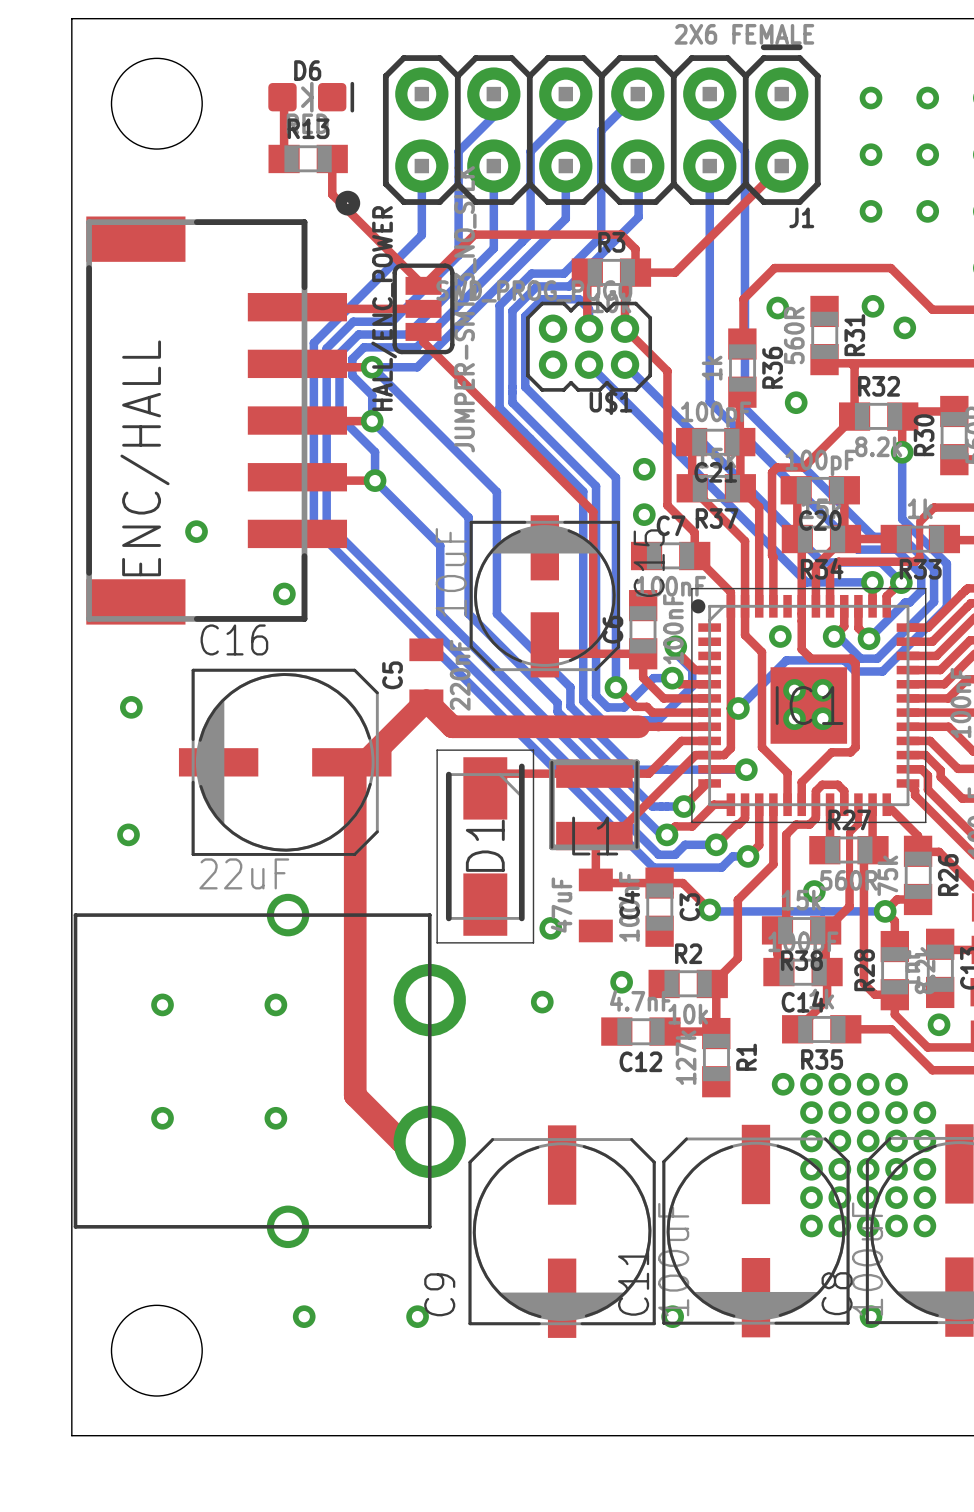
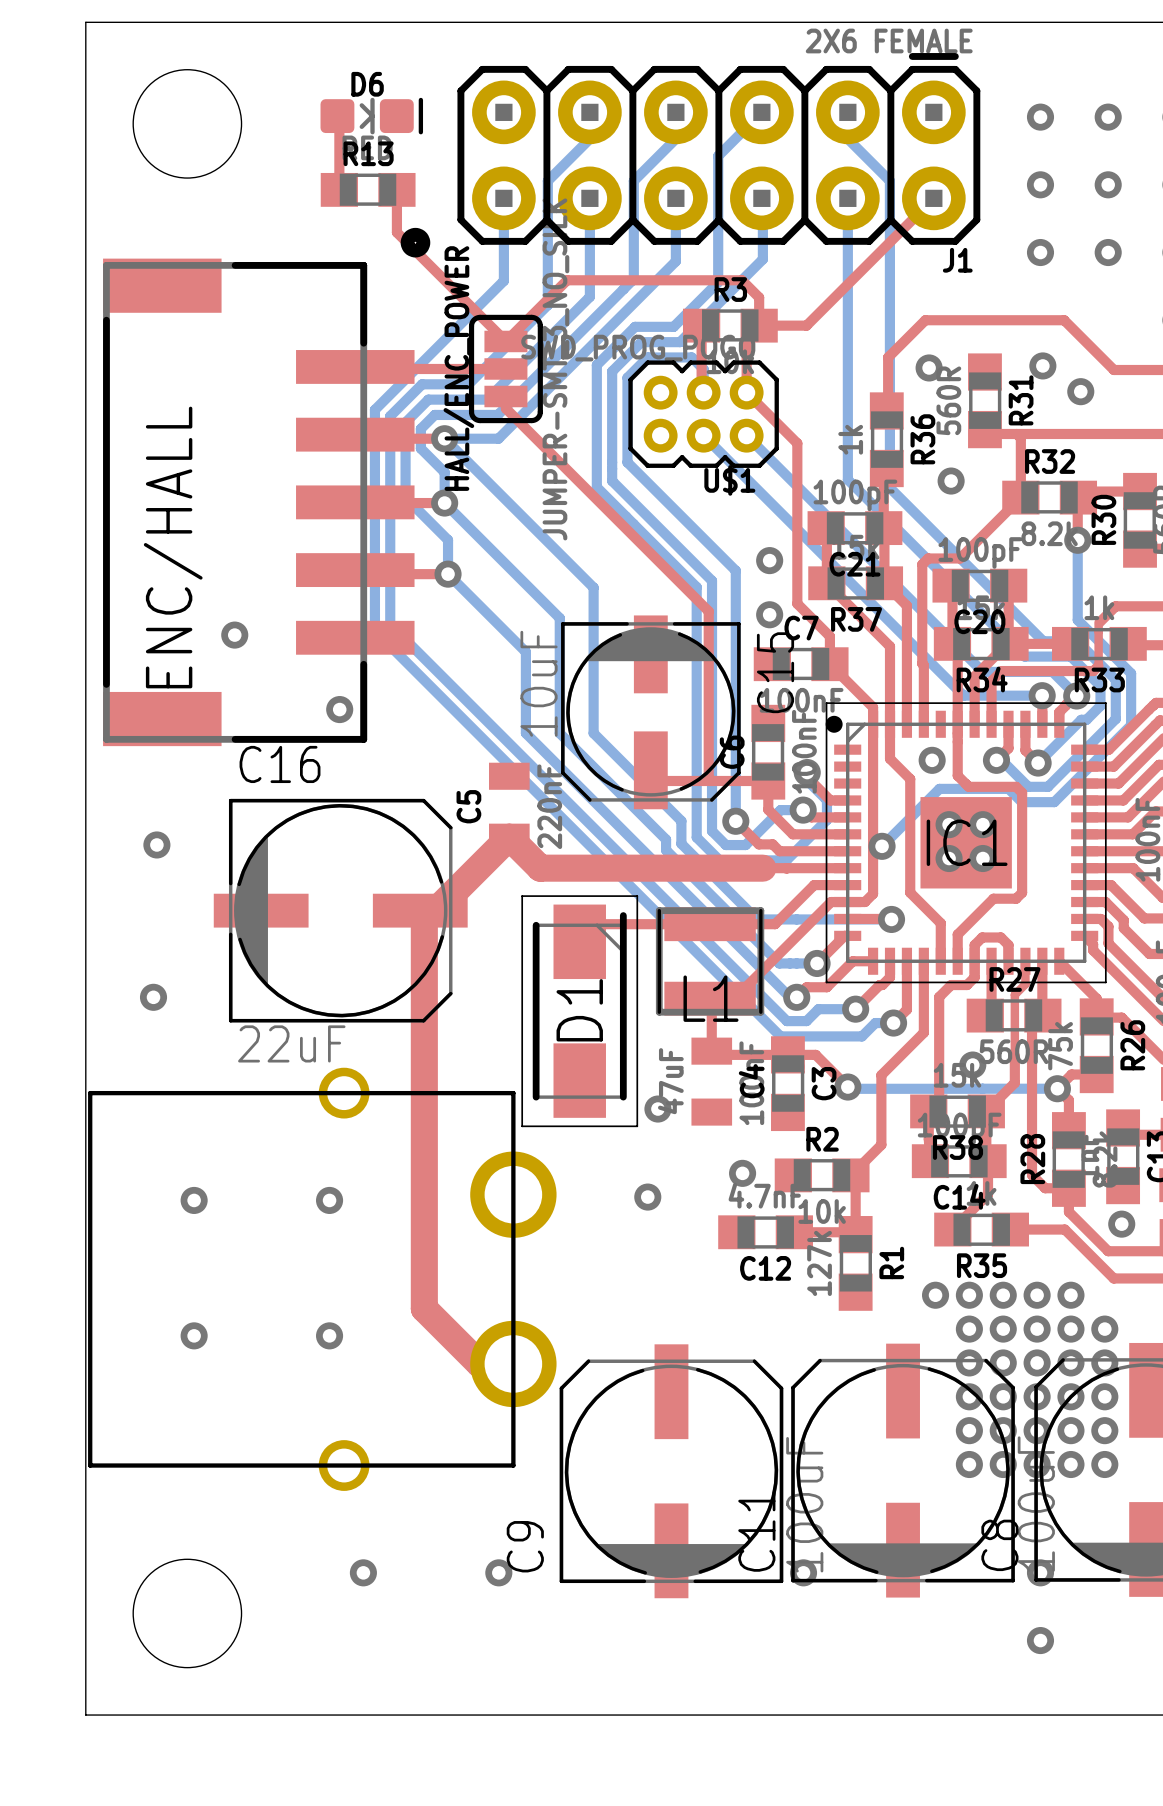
via: none -> (1040, 1640)

